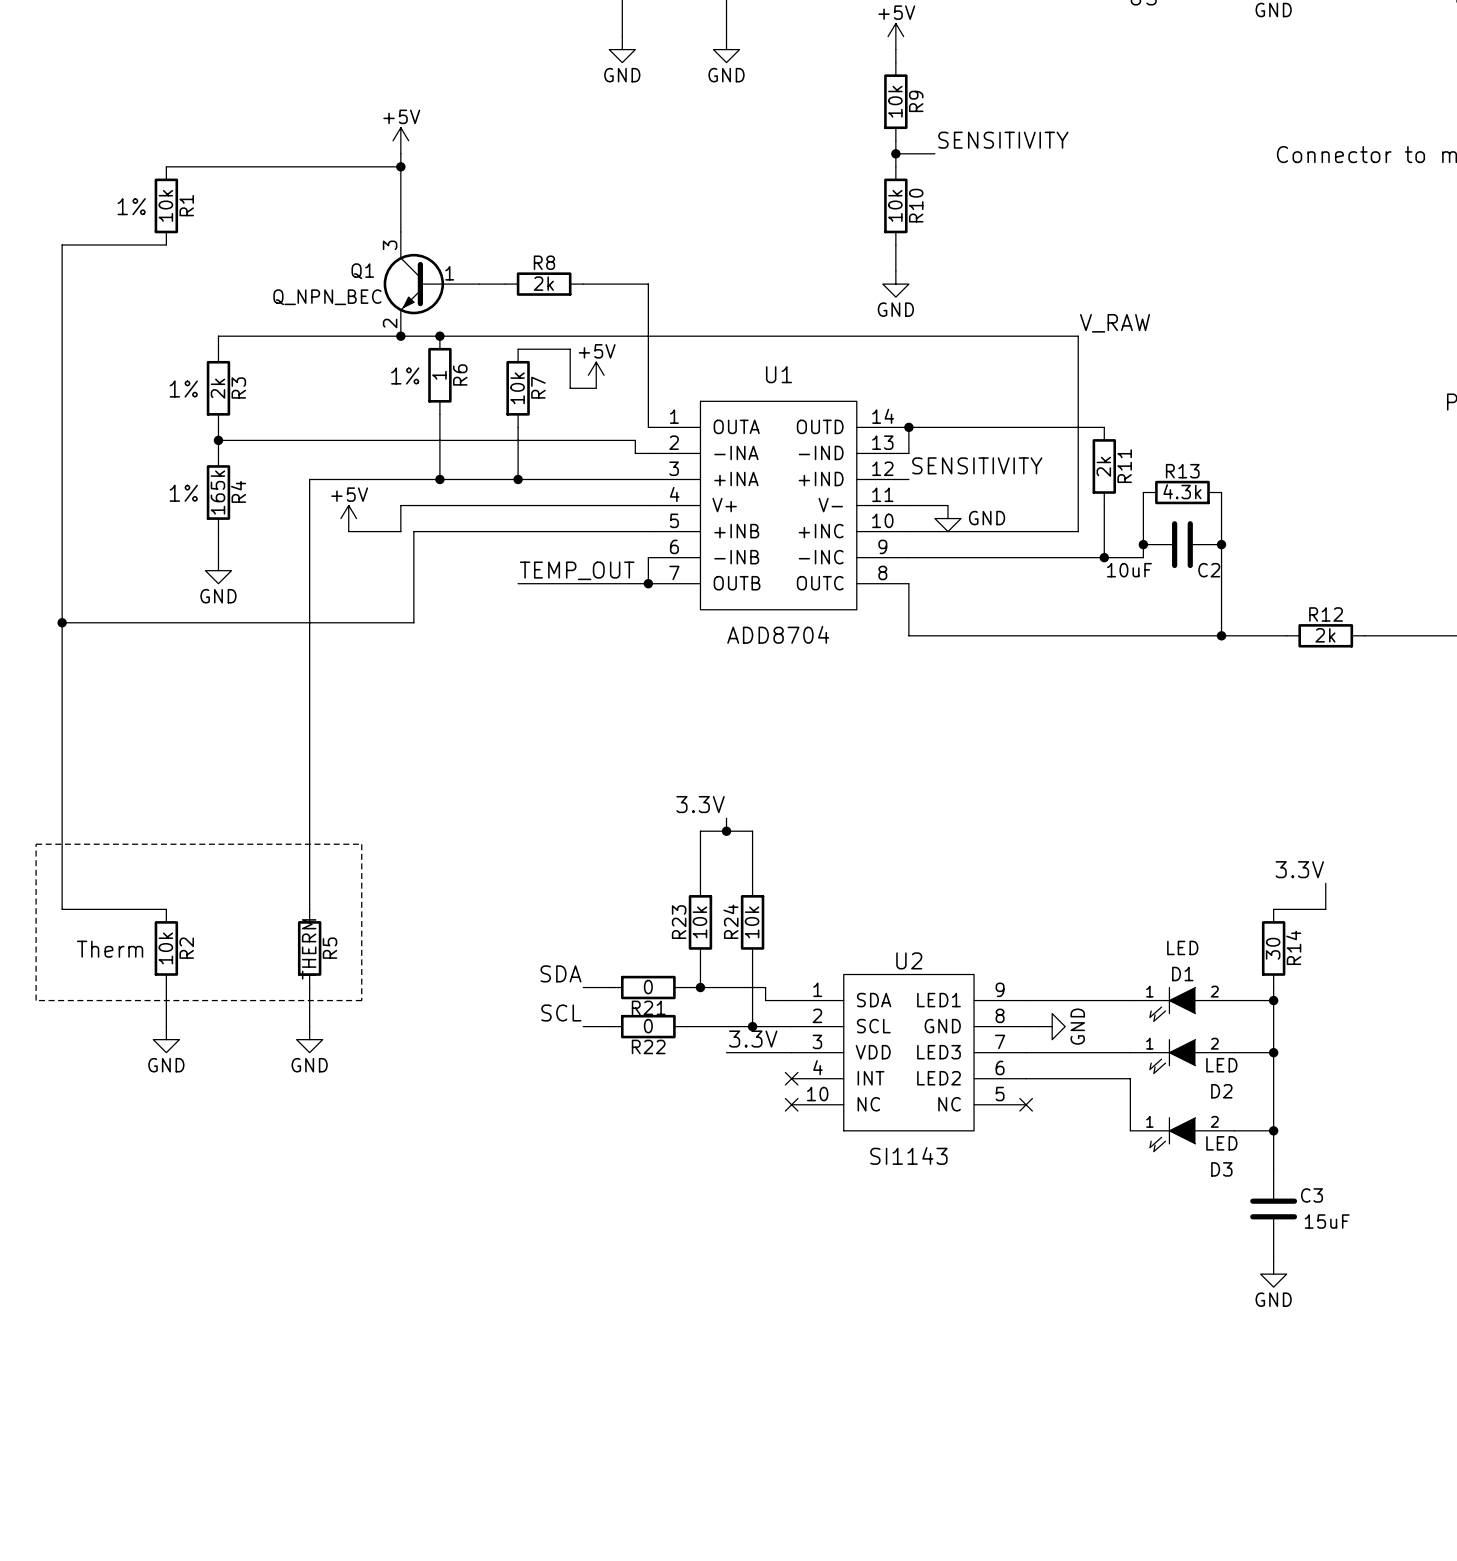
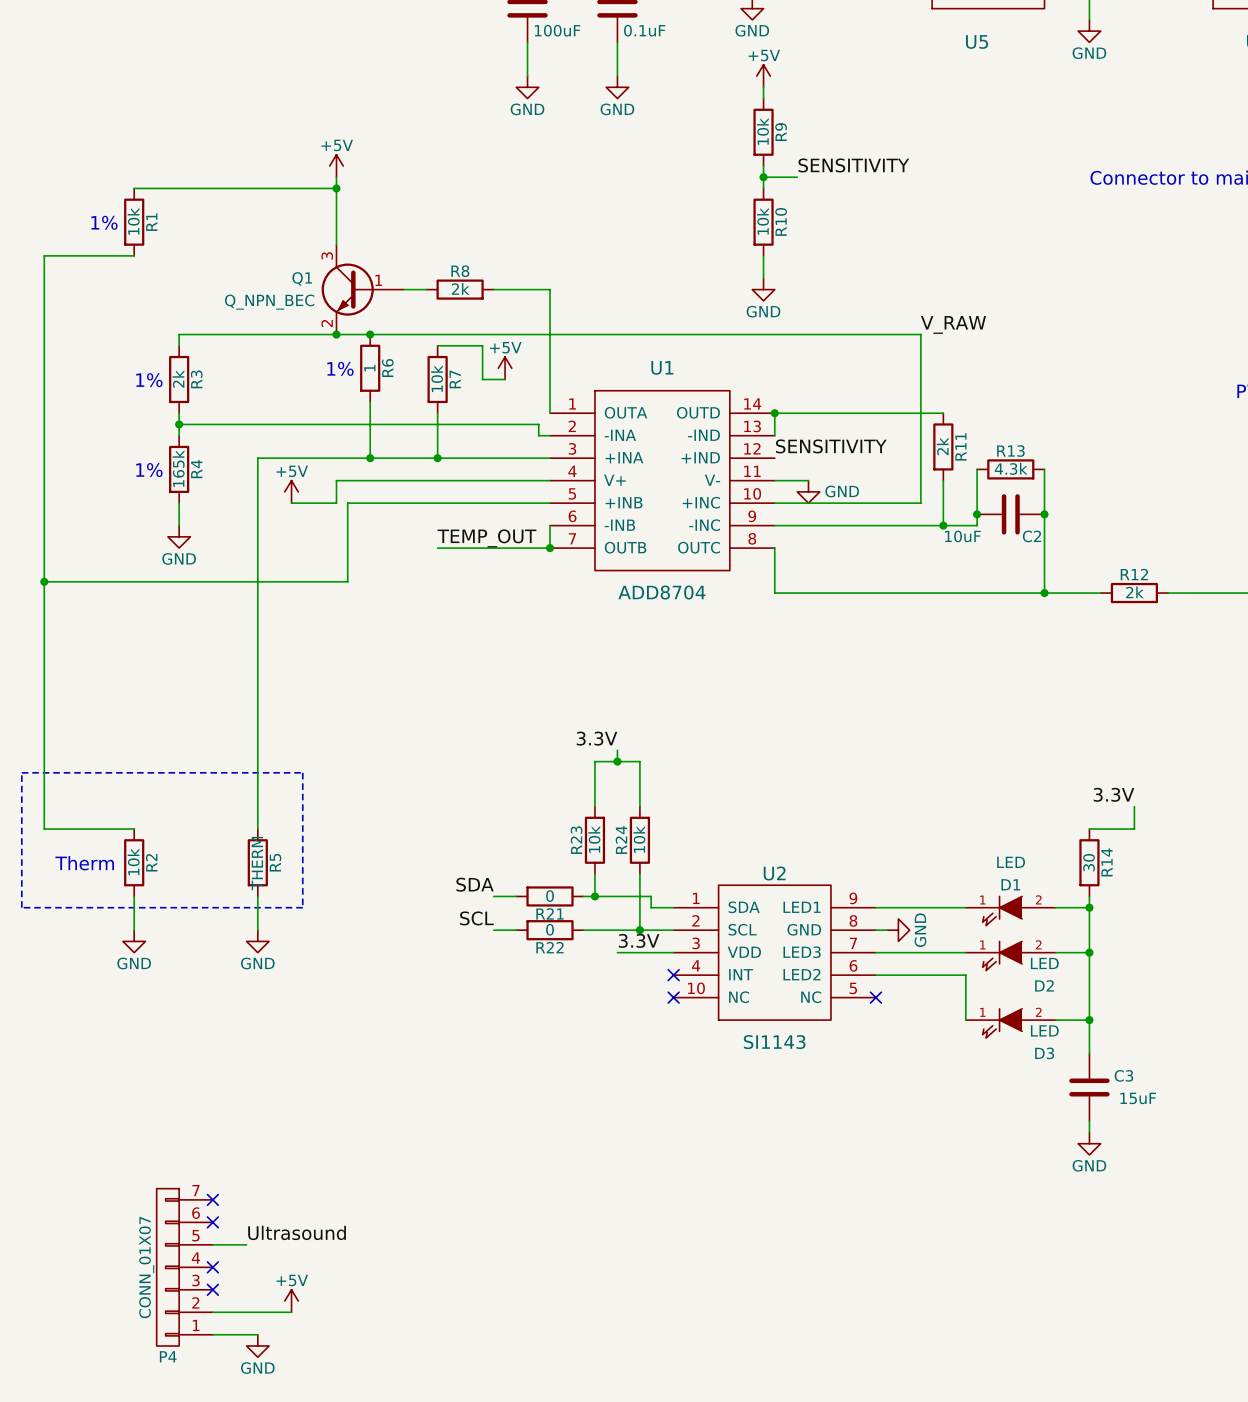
no-connect mark: none -> (212, 1199)
no-connect mark: none -> (212, 1222)
label: none -> Ultrasound (297, 1232)
wire: none -> (212, 1244) (246, 1244)
P4: none -> CONN_01X07 (184, 1267)
no-connect mark: none -> (212, 1267)
no-connect mark: none -> (212, 1289)
power symbol: none -> +5V (291, 1301)
wire: none -> (212, 1312) (291, 1312)
wire: none -> (212, 1334) (257, 1334)
power symbol: none -> GND (257, 1346)

